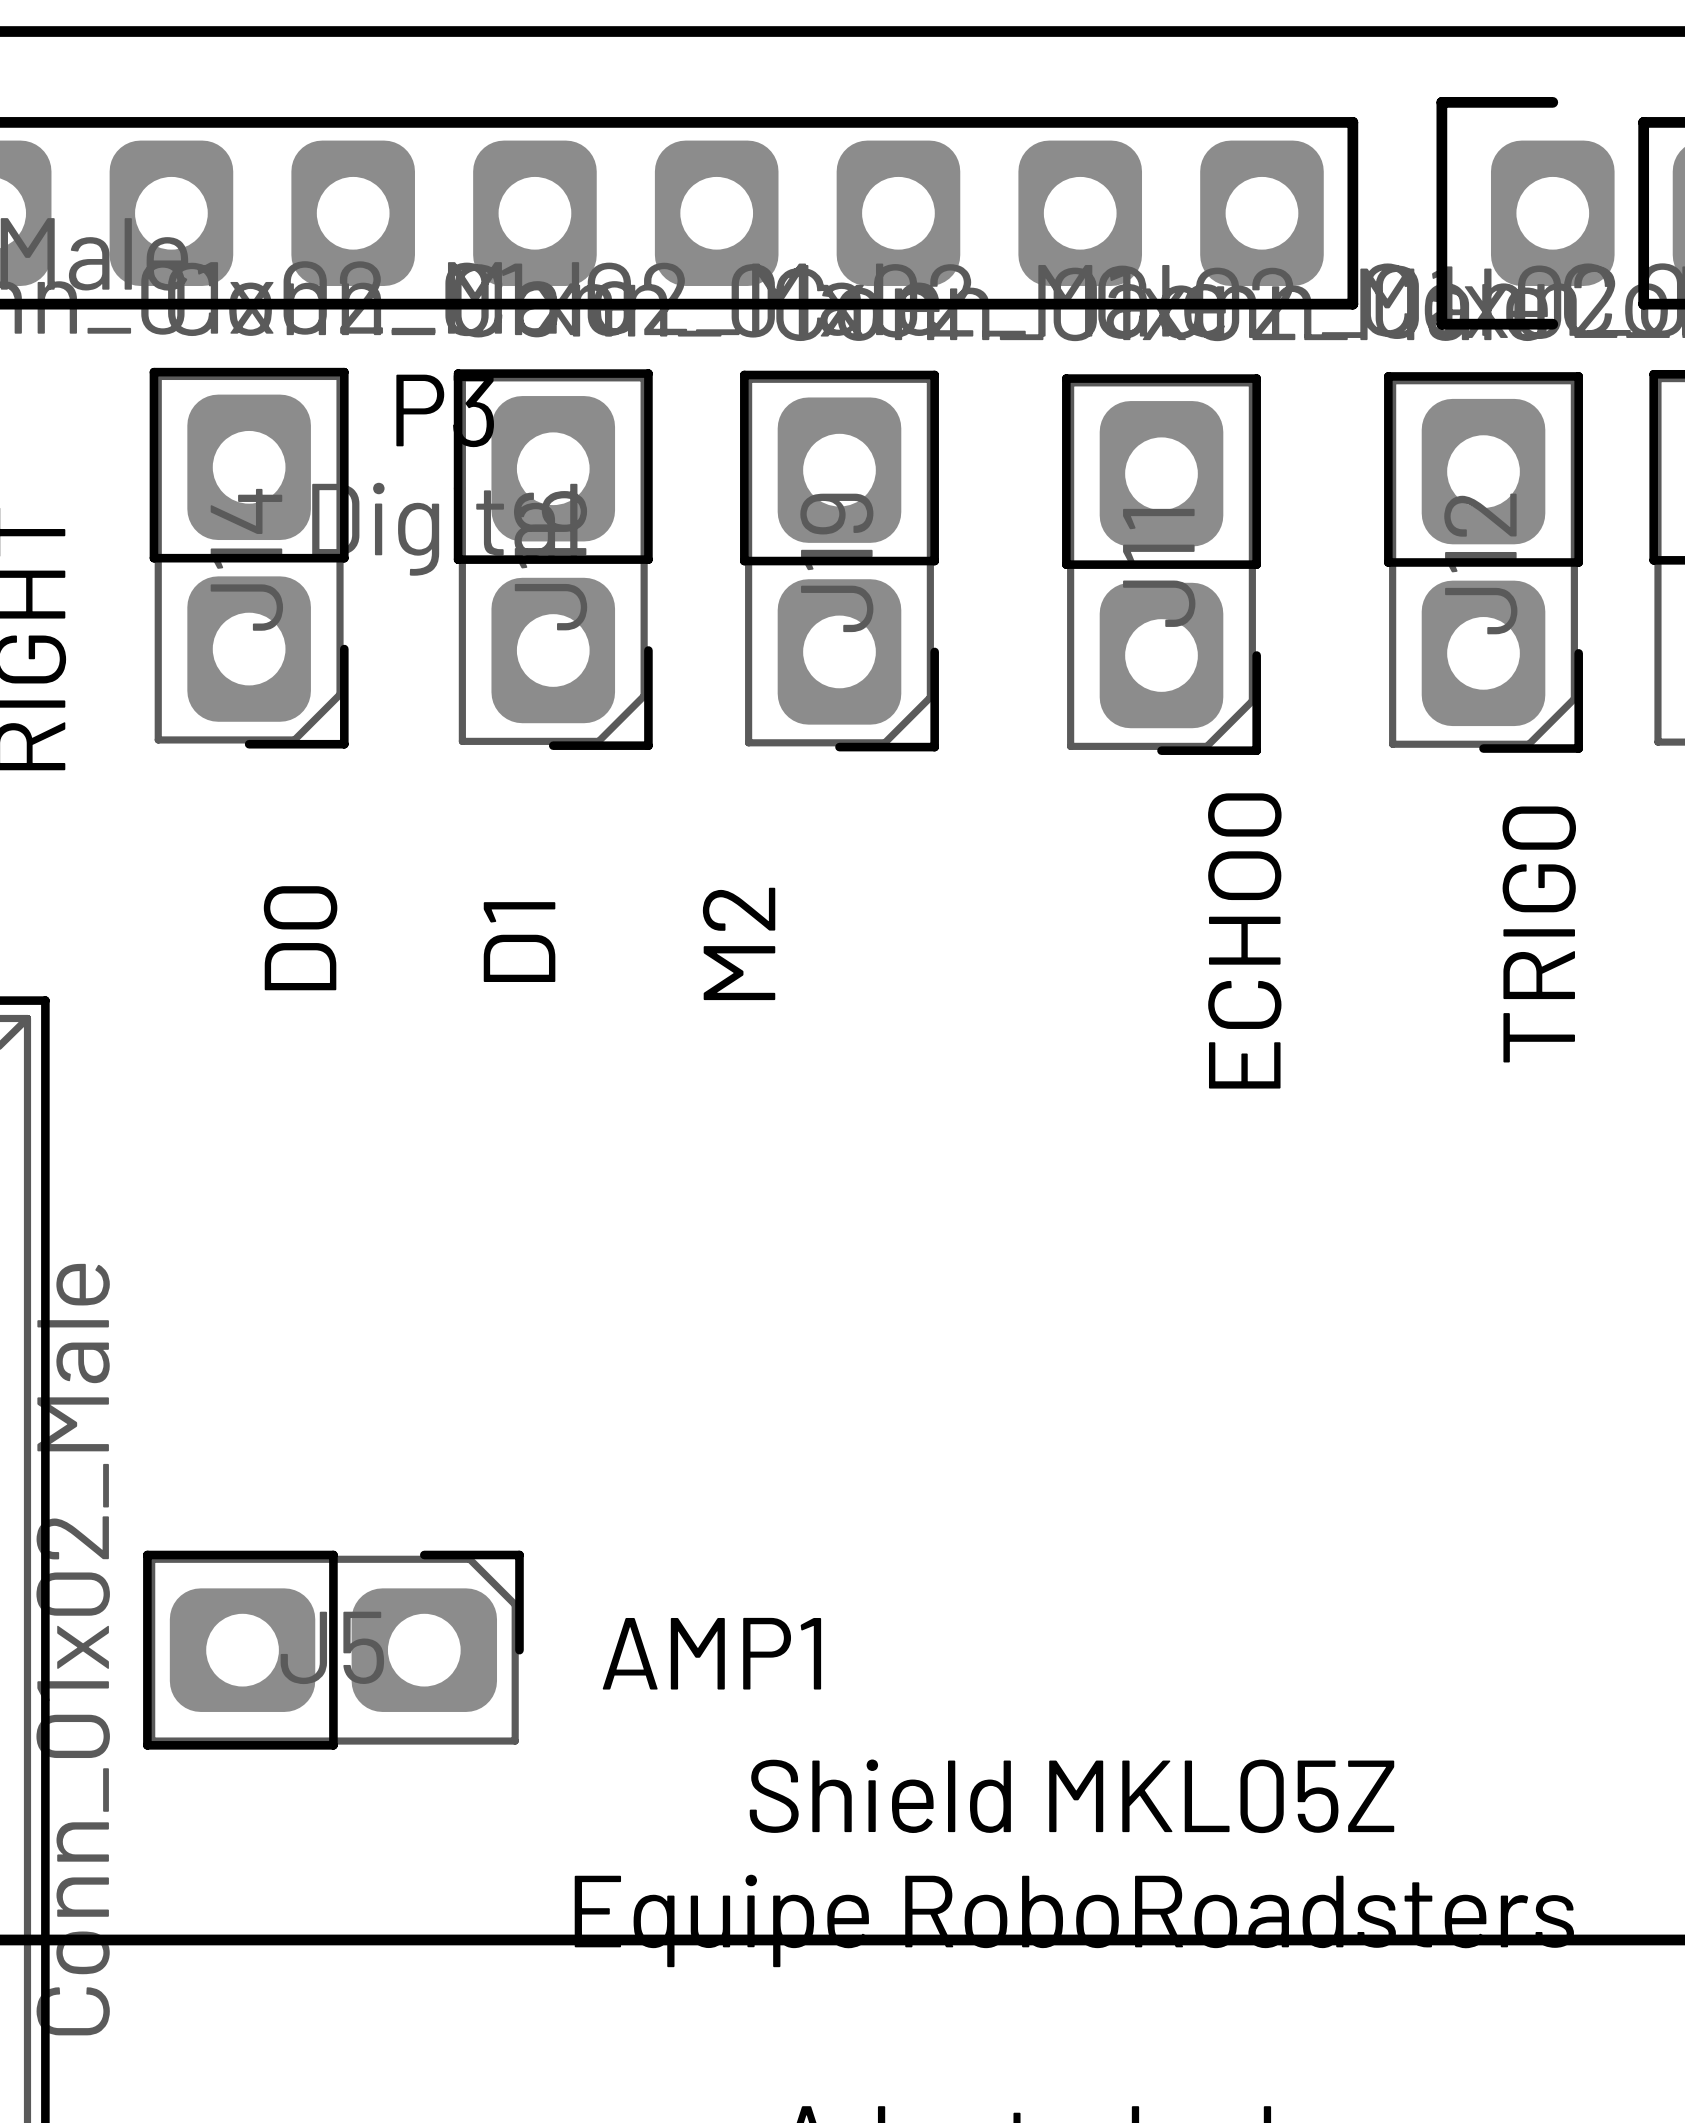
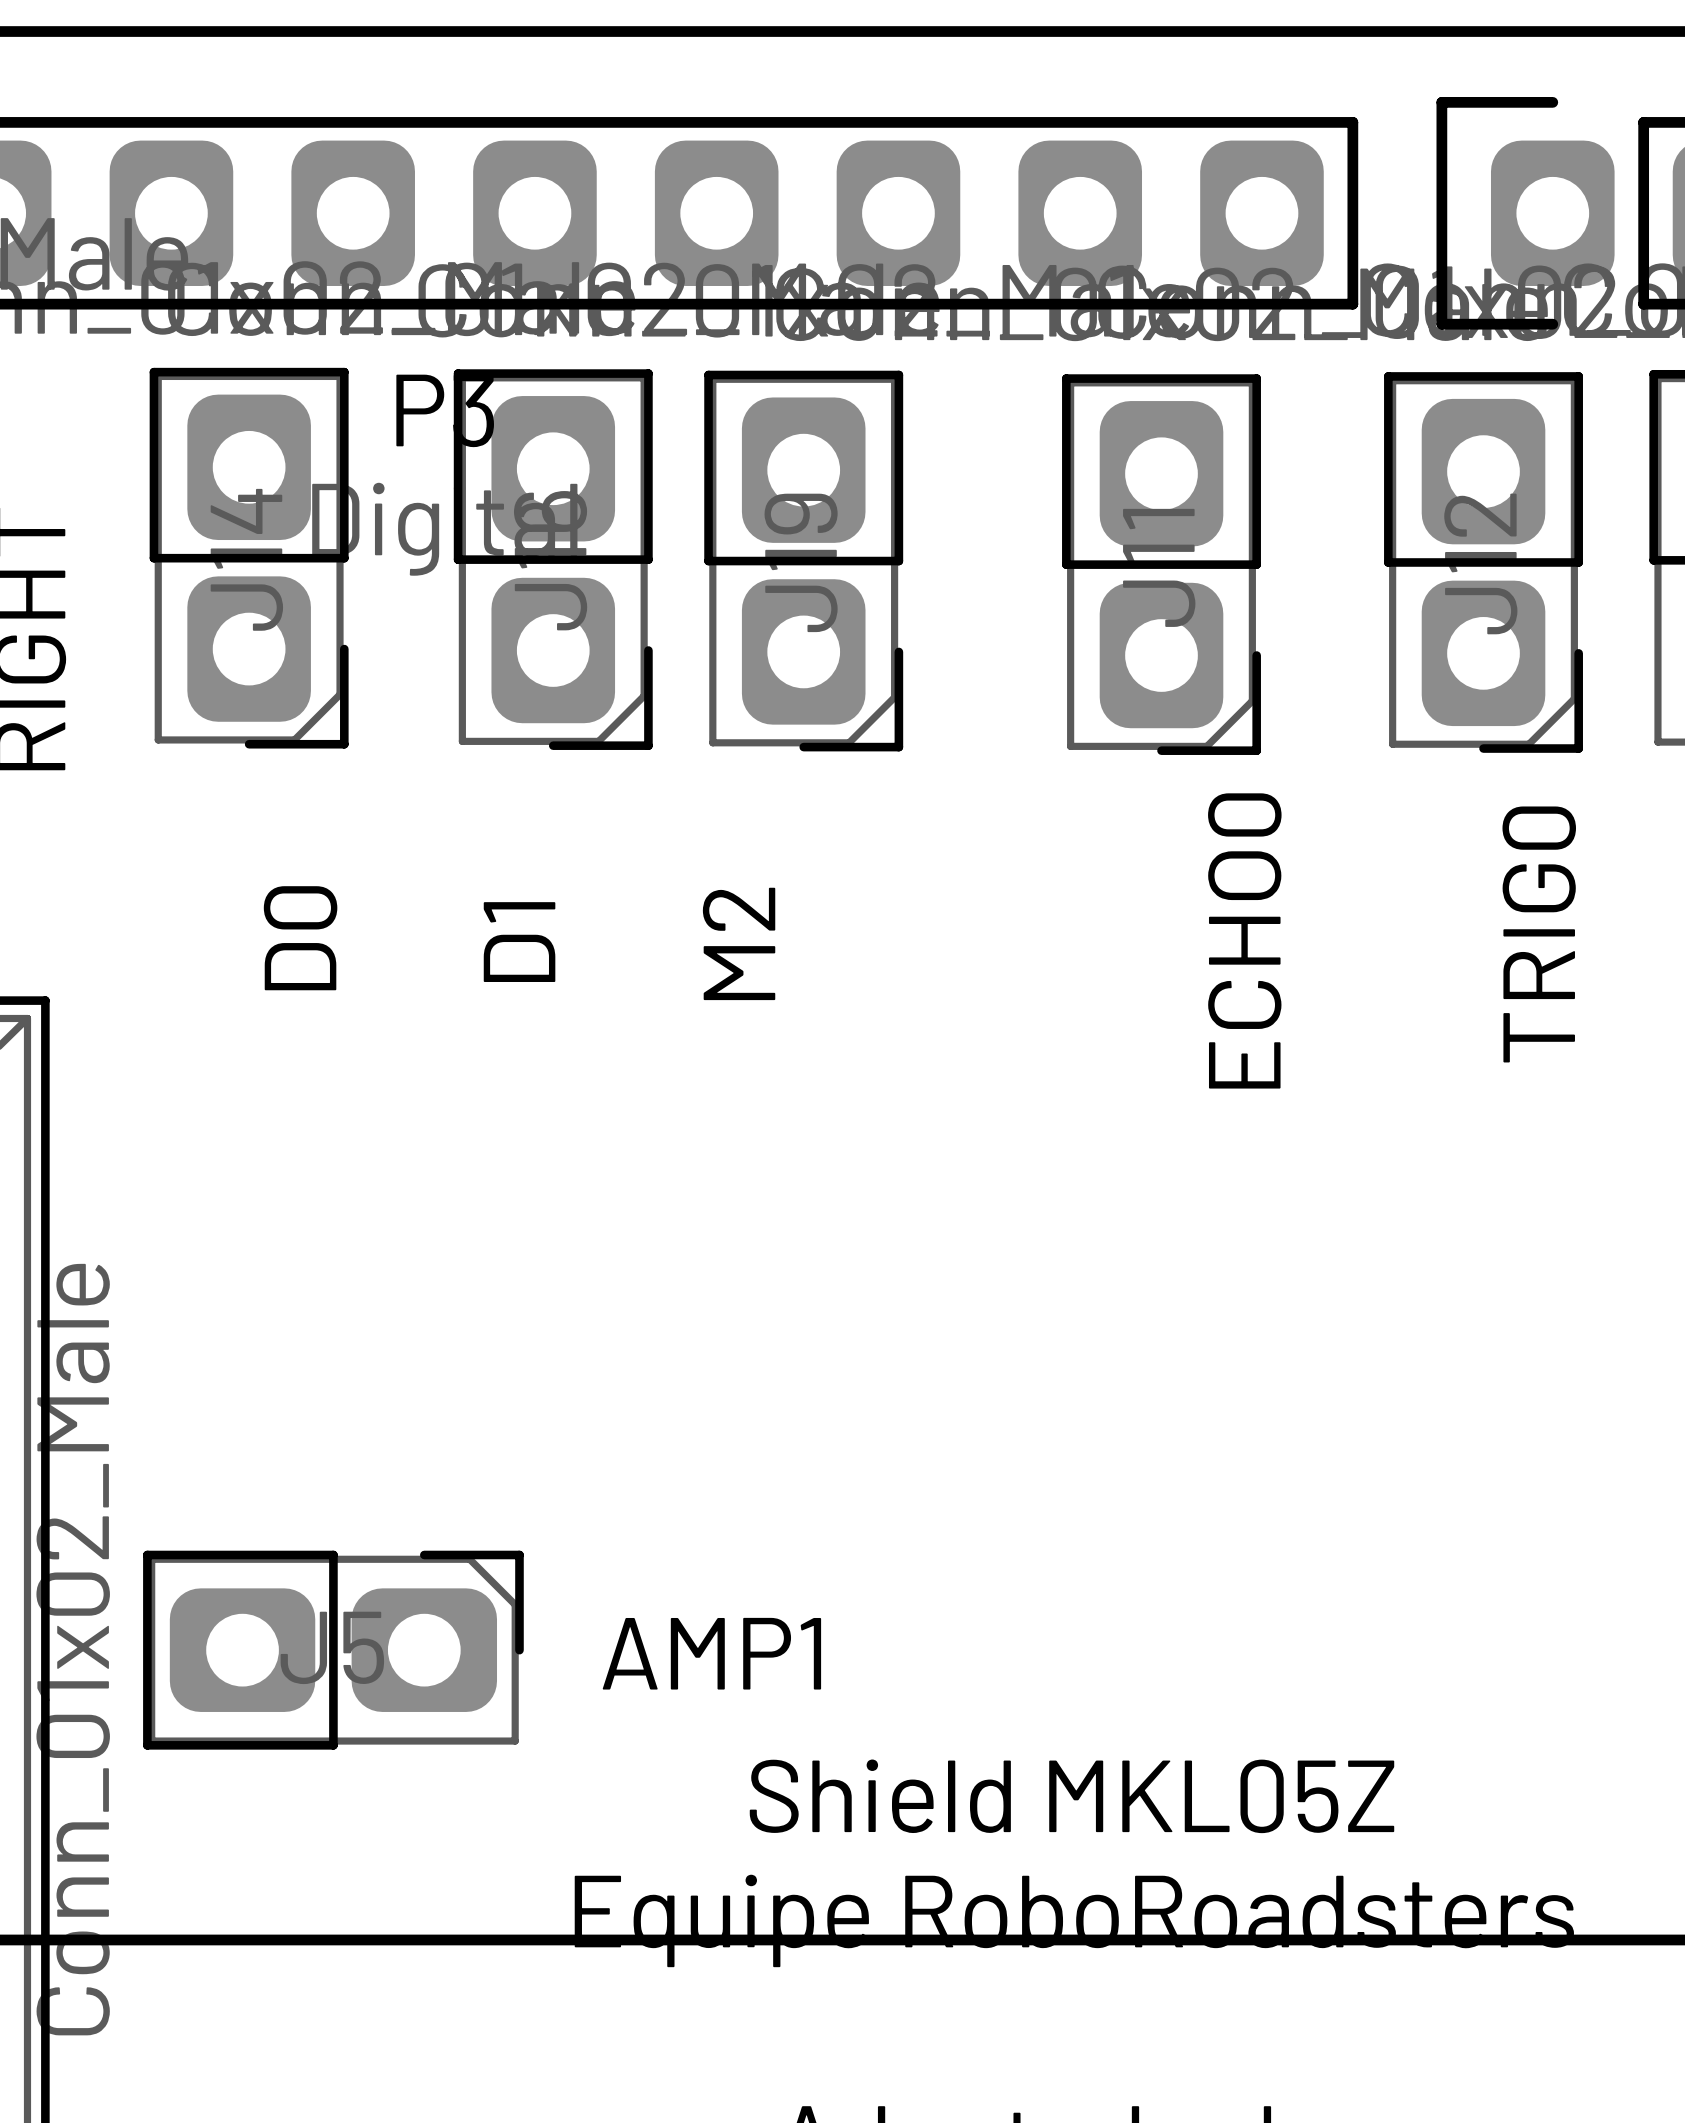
part position: (839, 561) -> (803, 561)

